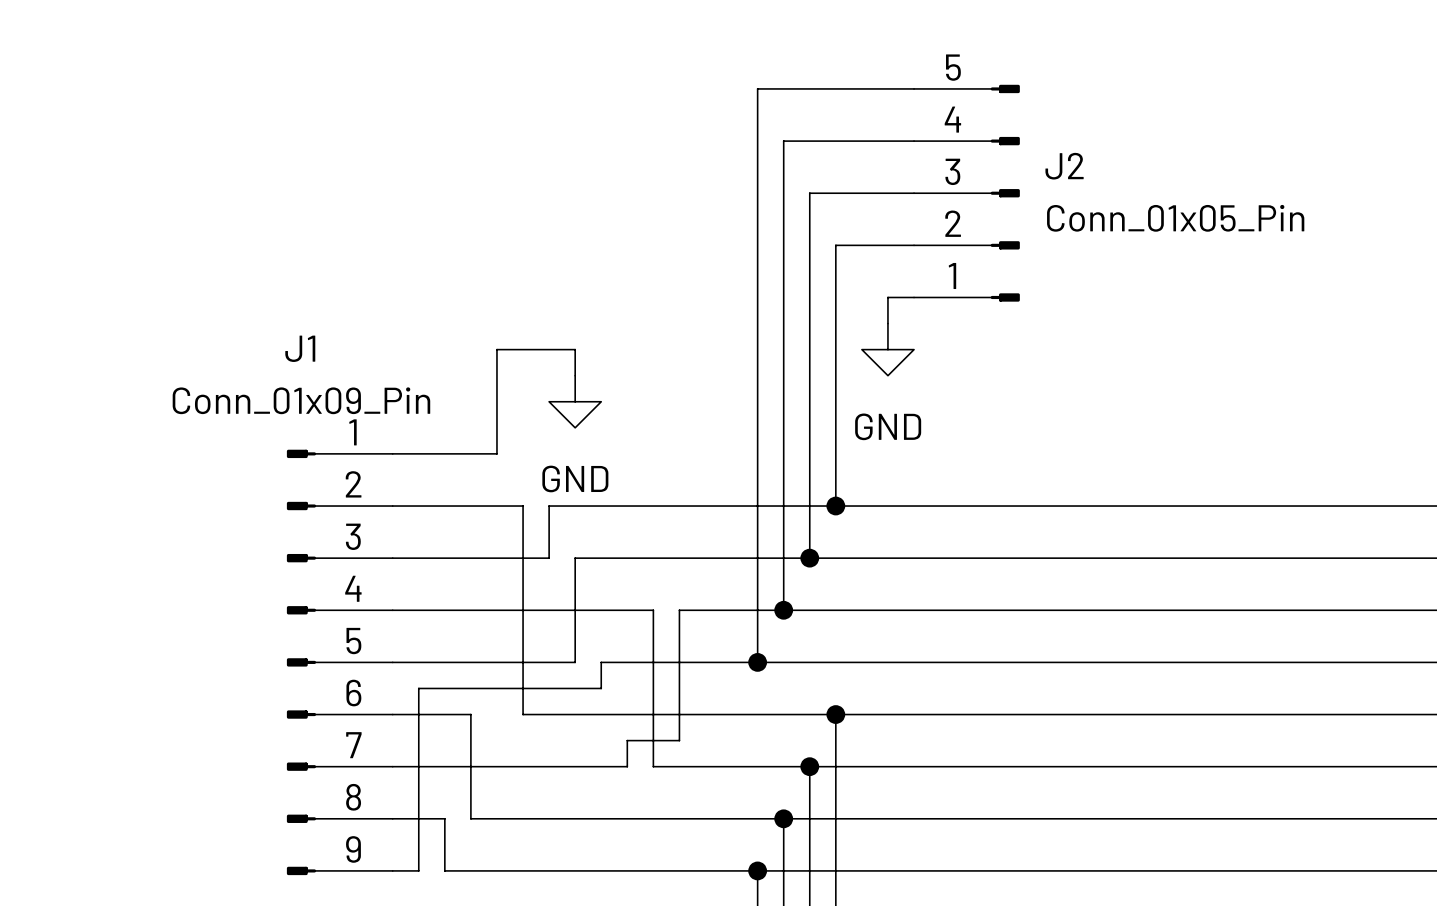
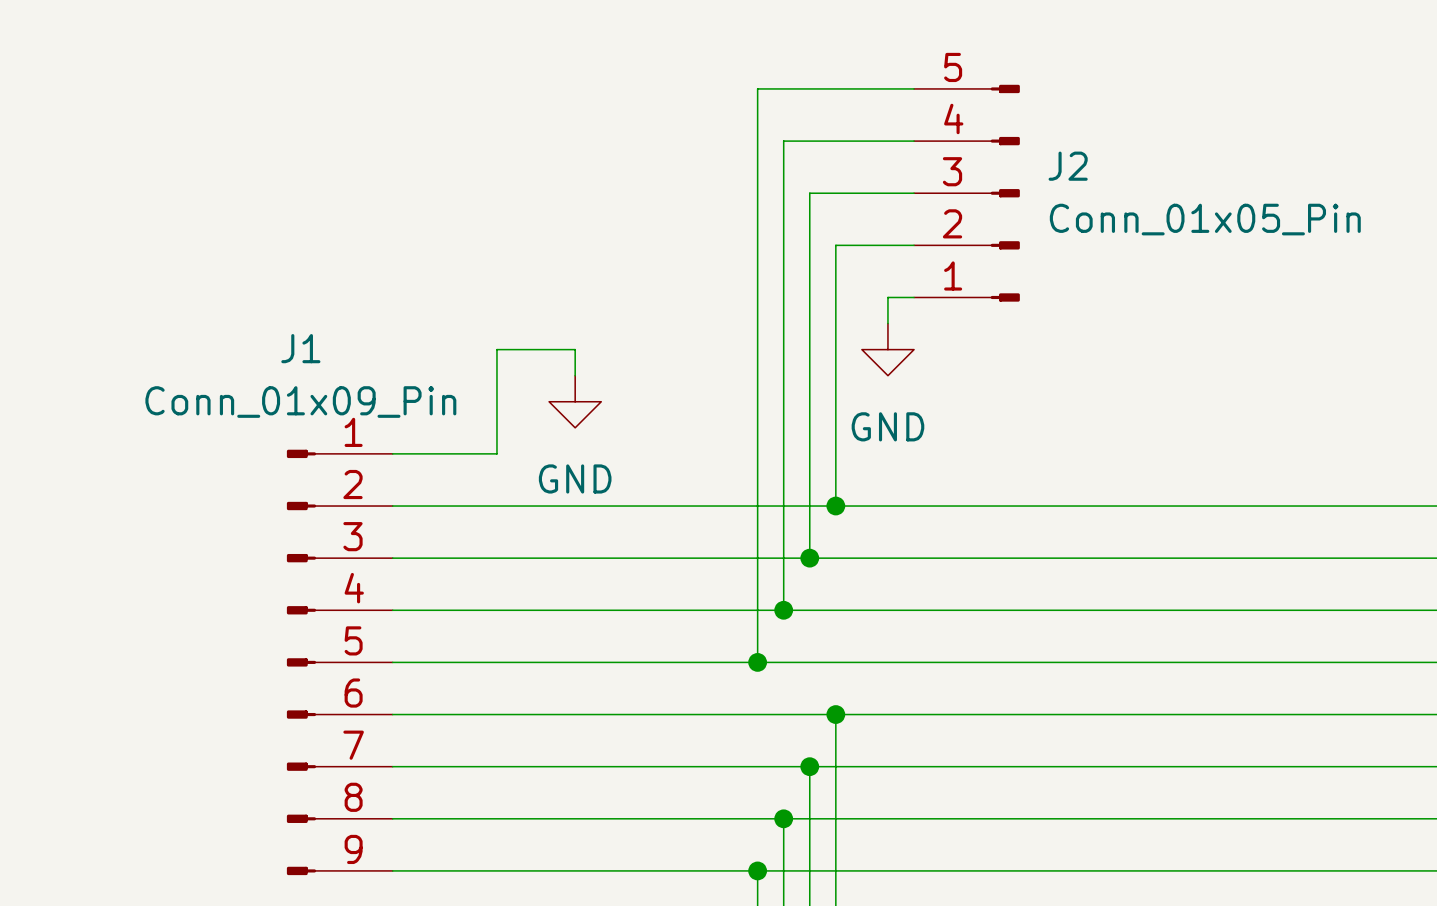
wire: (523, 506) (523, 714) -> none
wire: (549, 506) (549, 558) -> (549, 506) (523, 506)
wire: (575, 558) (575, 662) -> (575, 558) (549, 558)
wire: (653, 610) (653, 766) -> (627, 766) (653, 766)
wire: (679, 610) (679, 740) (627, 740) (627, 766) -> (679, 610) (653, 610)
wire: none -> (575, 662) (601, 662)
wire: (601, 662) (601, 688) (418, 688) (418, 870) -> (444, 870) (418, 870)
wire: (470, 714) (470, 818) -> (470, 714) (523, 714)
wire: (444, 818) (444, 870) -> (444, 818) (470, 818)

